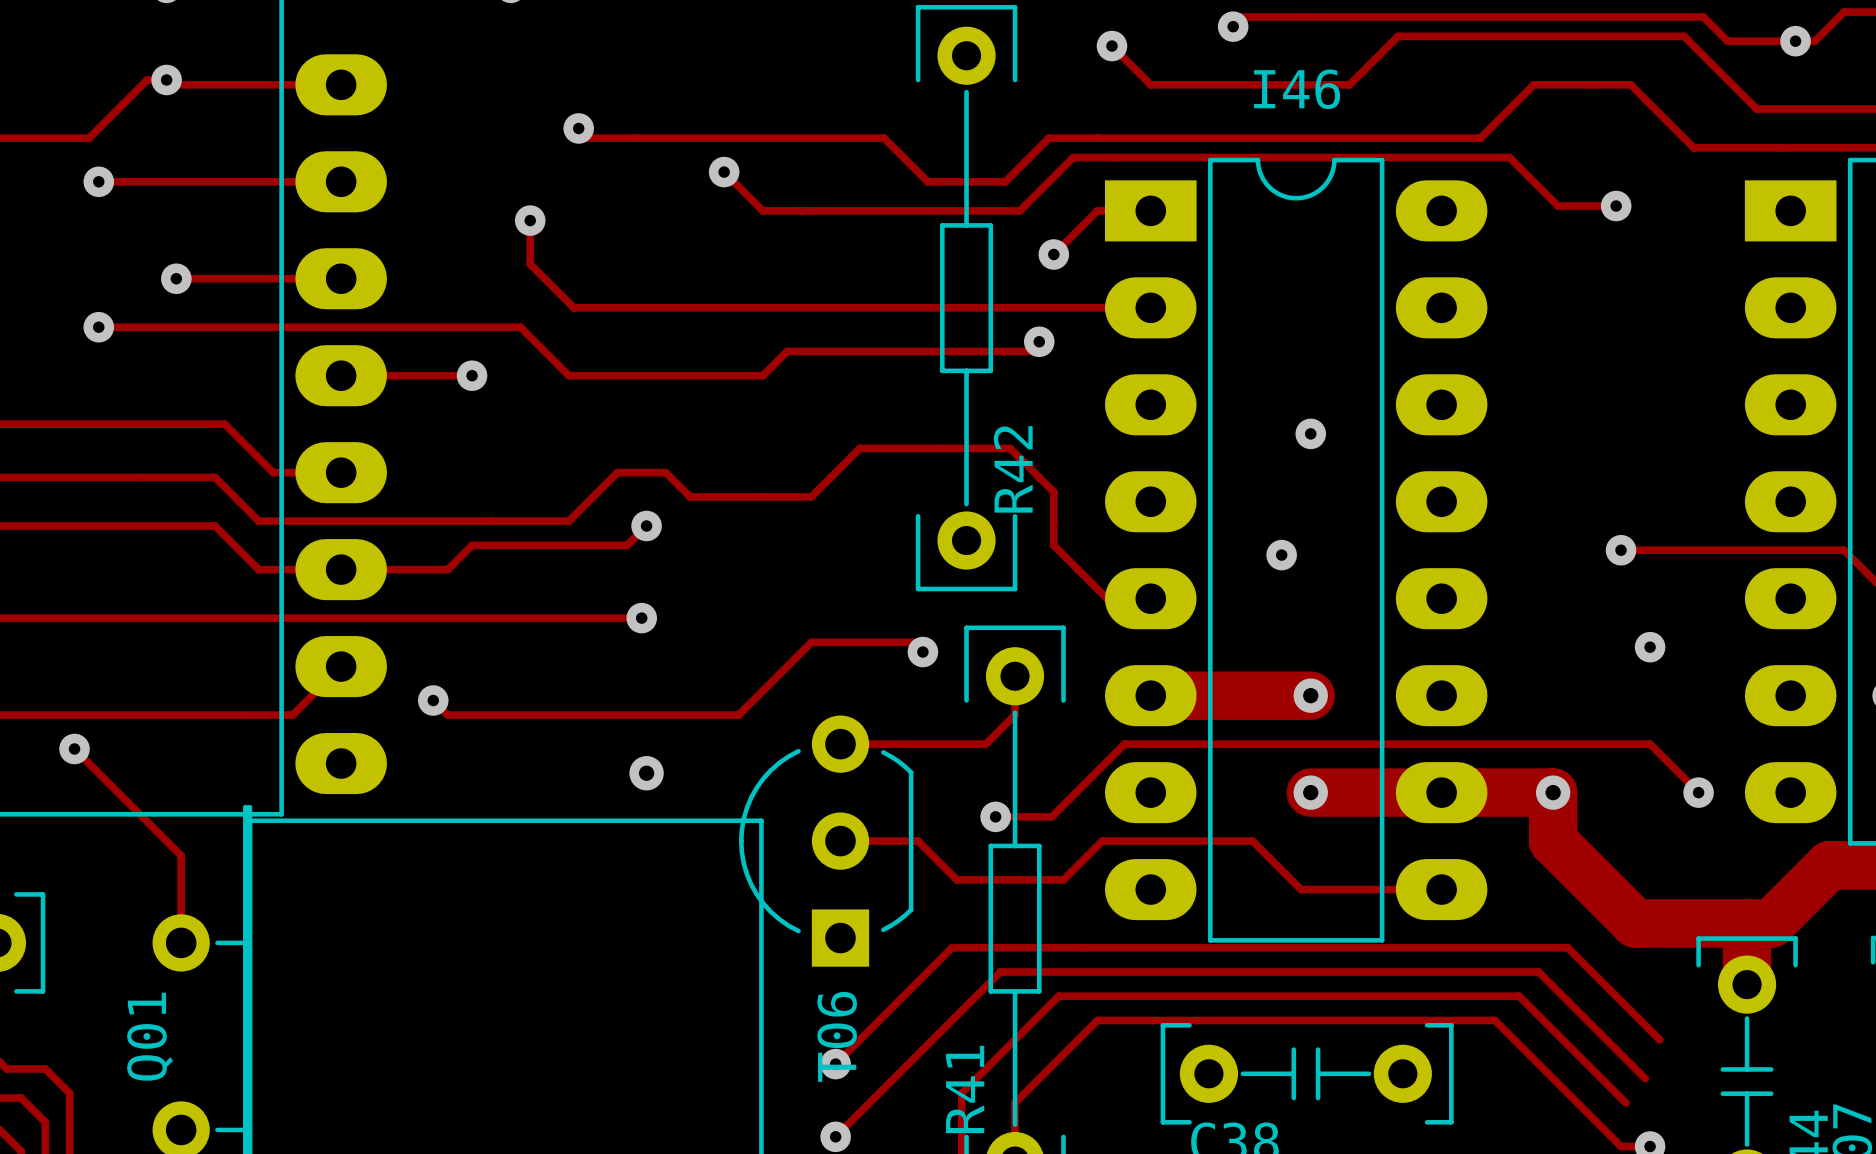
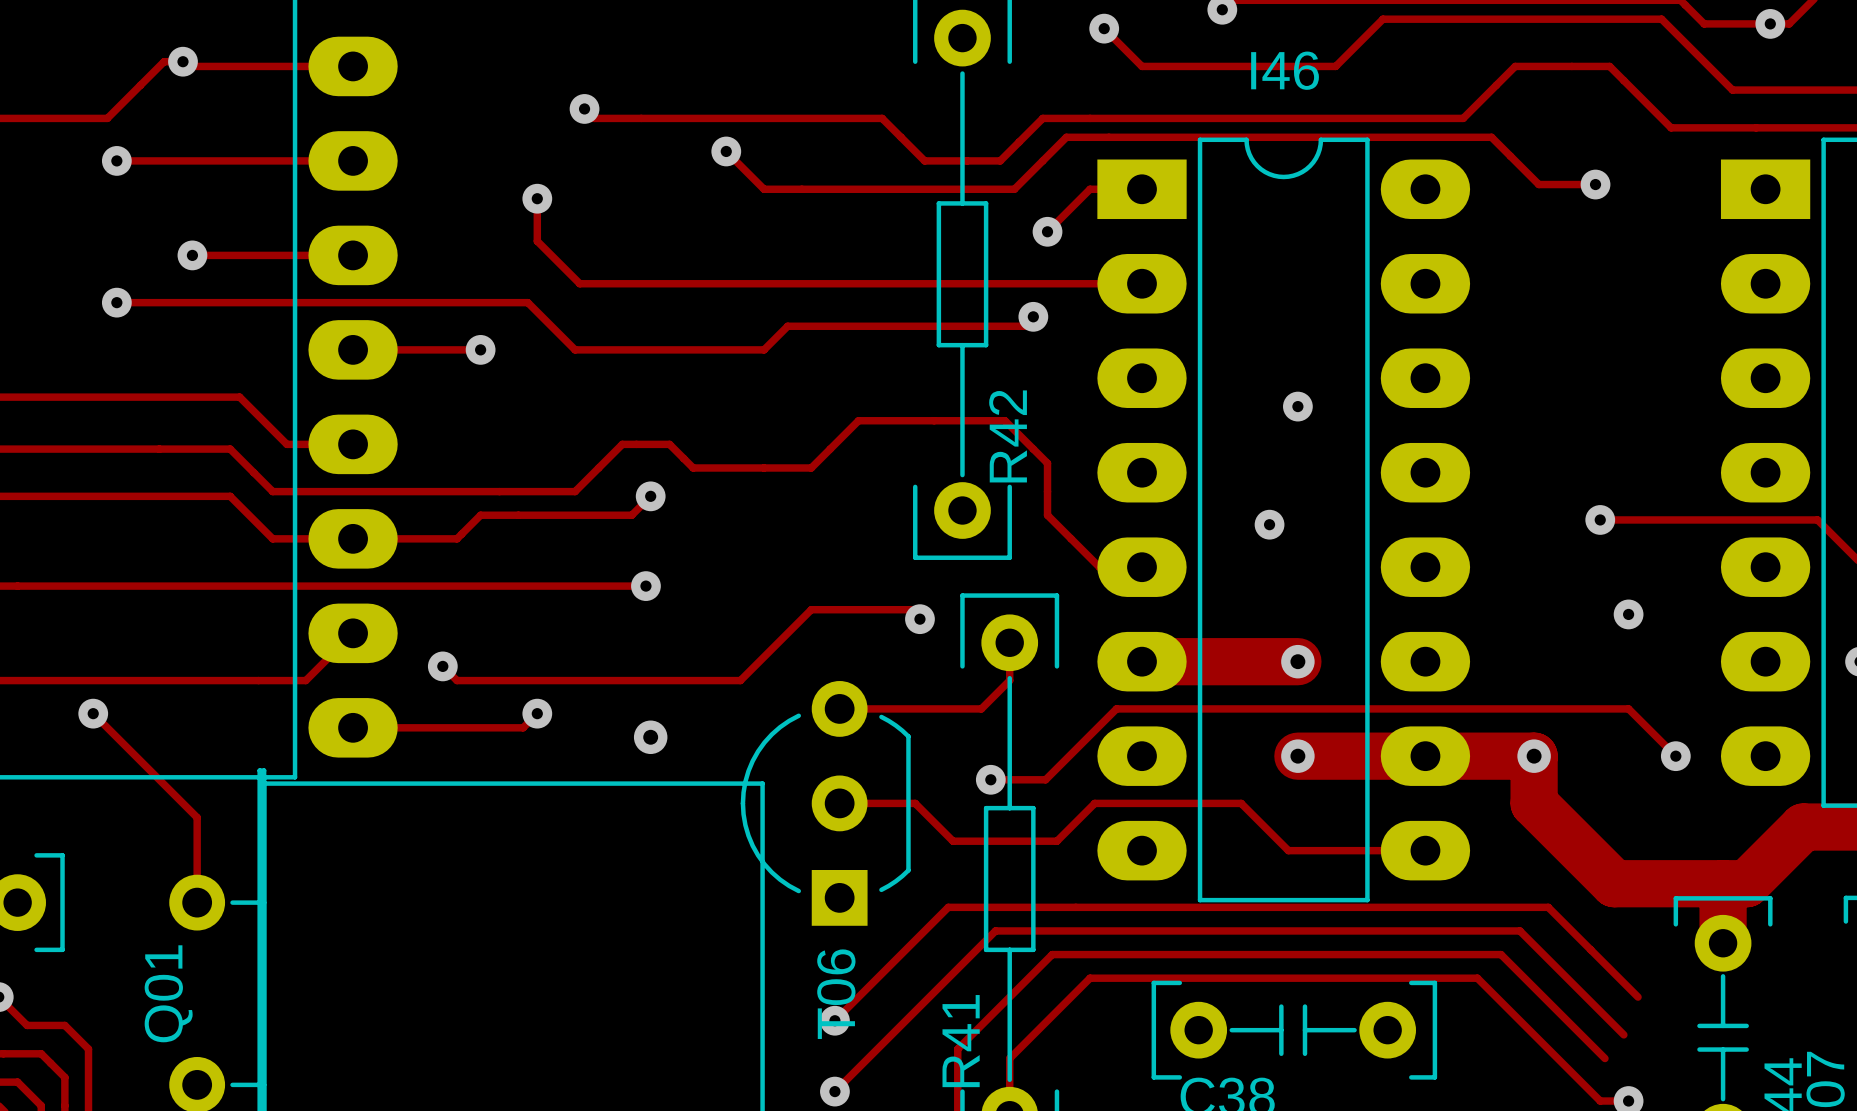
track: none -> (537, 713) (523, 727) (353, 727)
via: none -> (537, 713)

